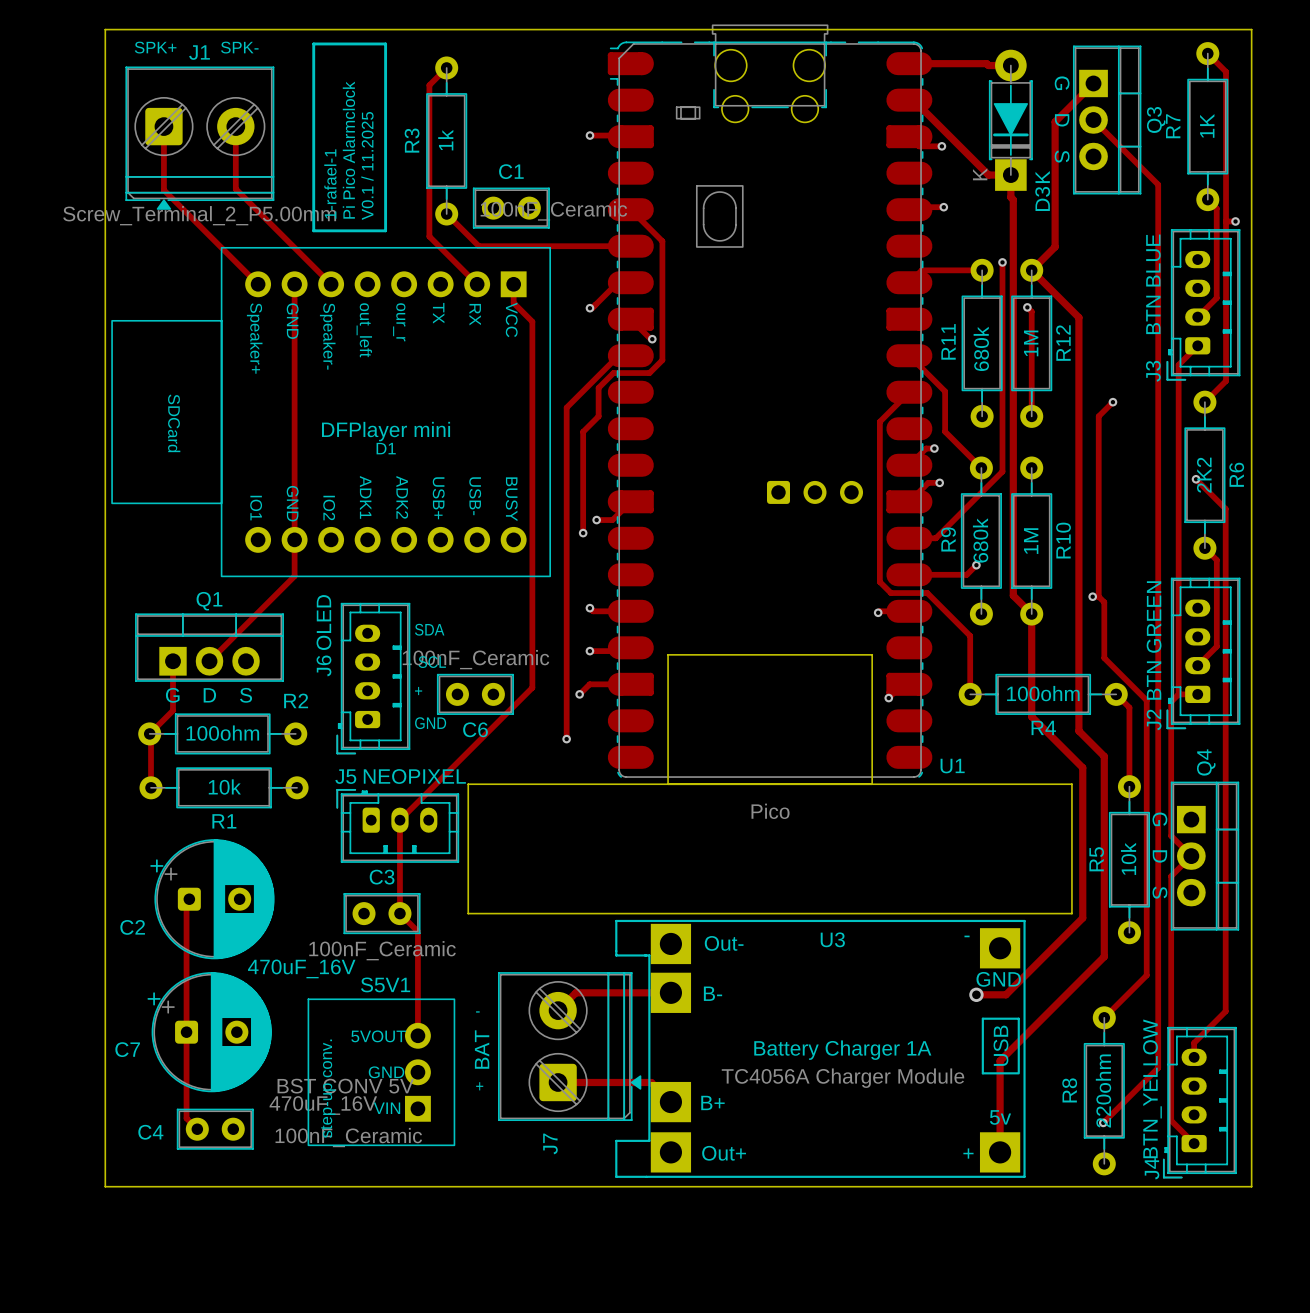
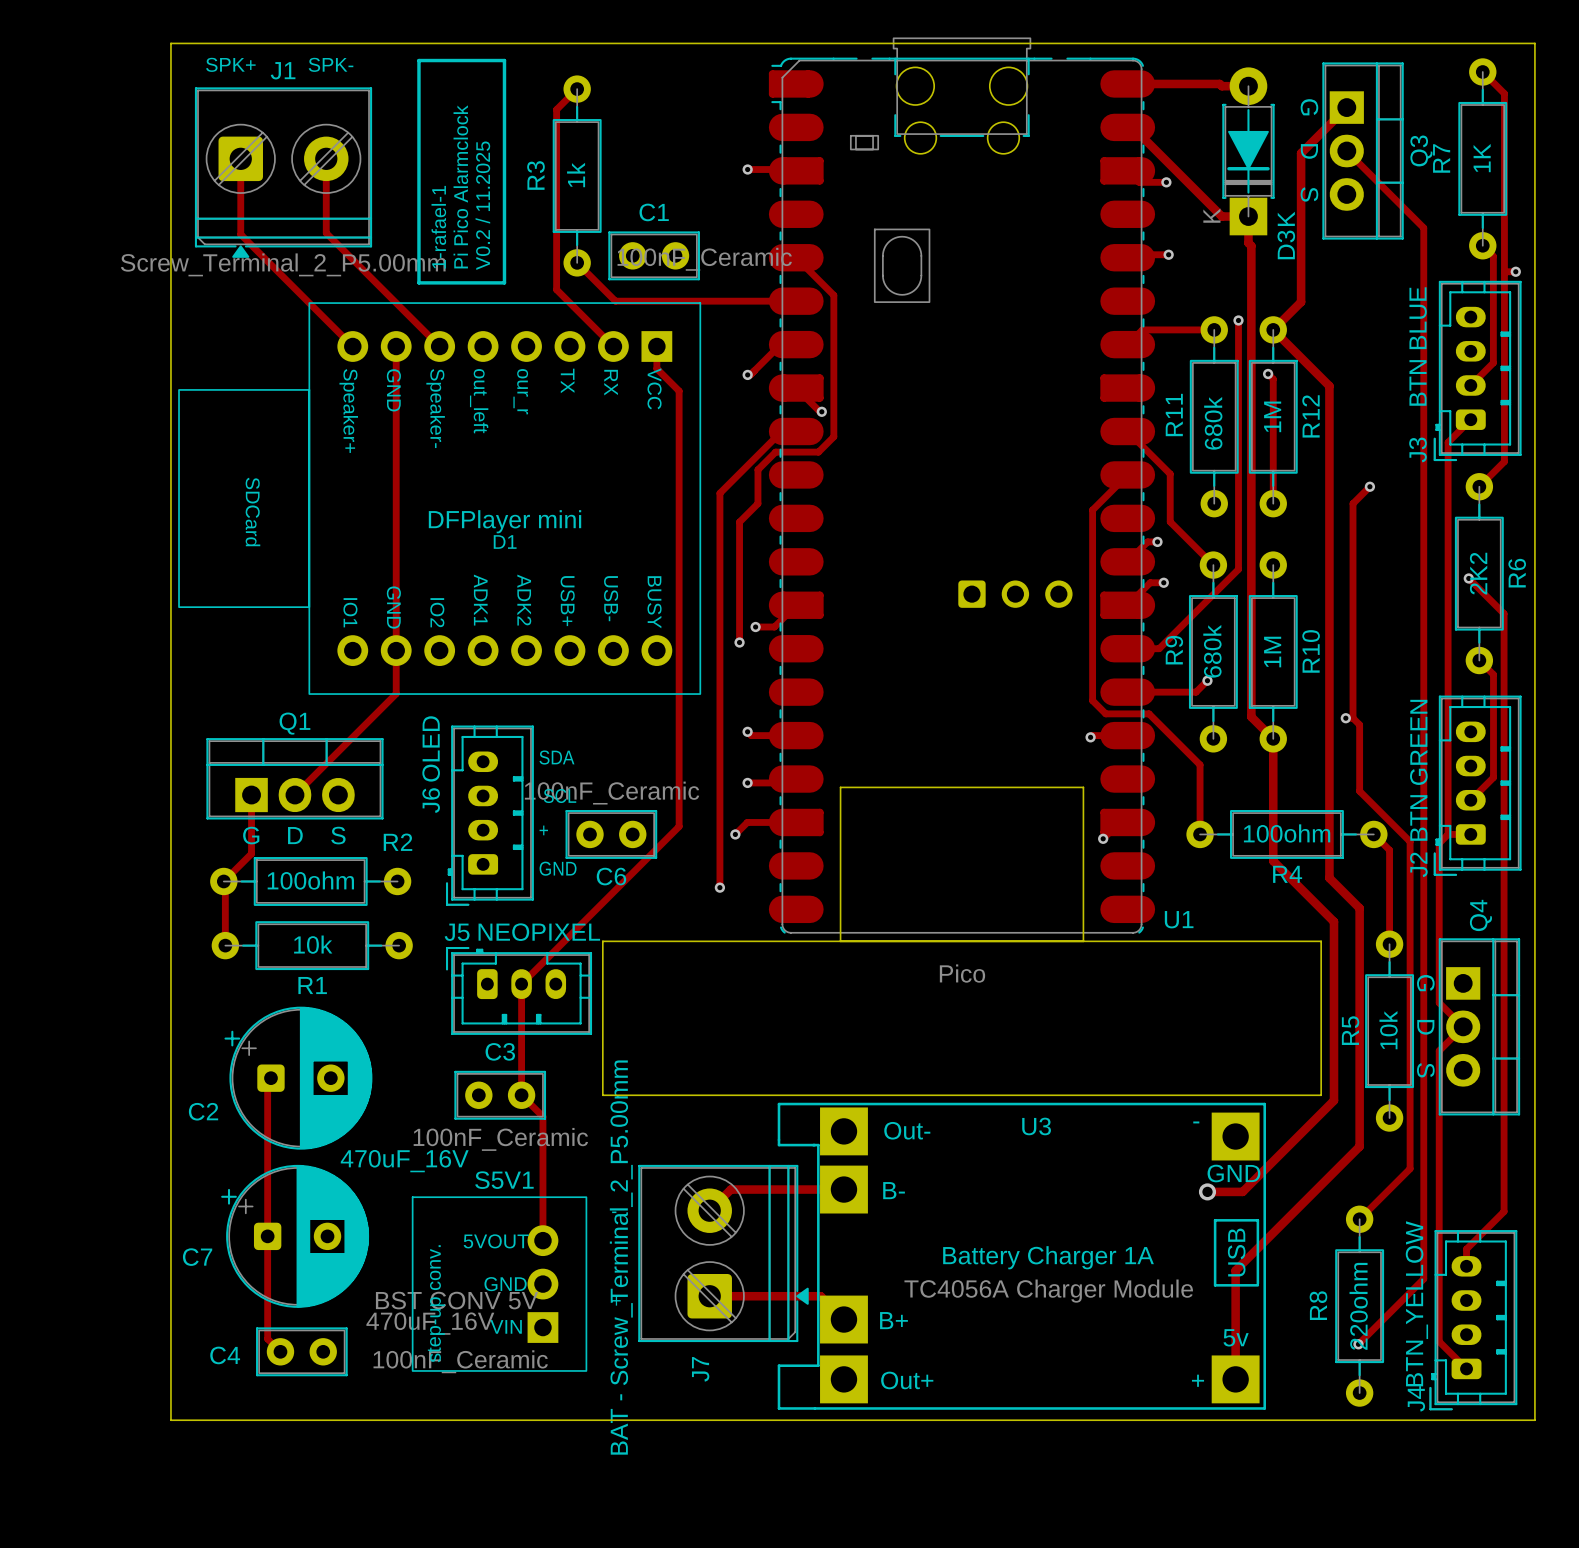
text: V0.1 / 11.2025 (367, 165) -> V0.2 / 11.2025 (482, 205)
J7 value: BAT (482, 1049) -> BAT - Screw_Terminal_2_P5.00mm (621, 1257)

